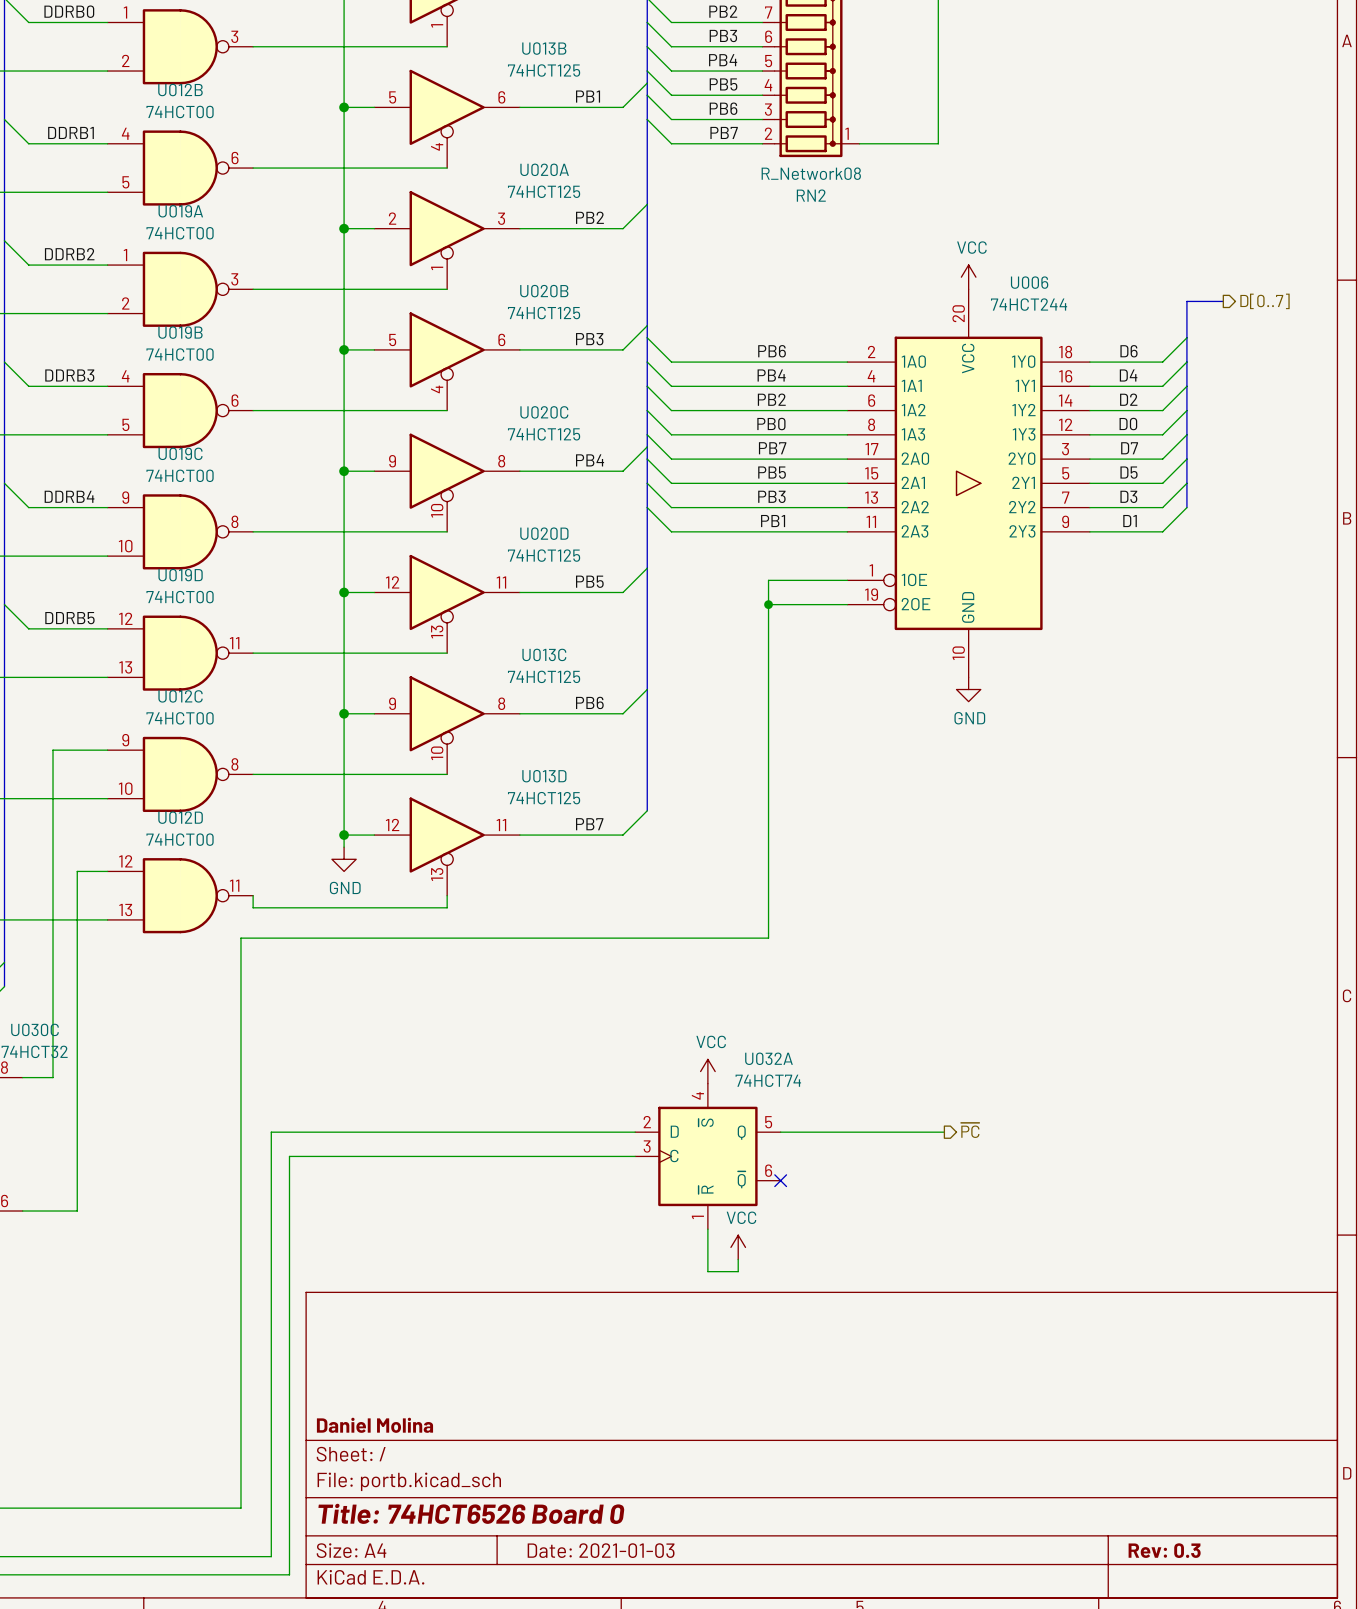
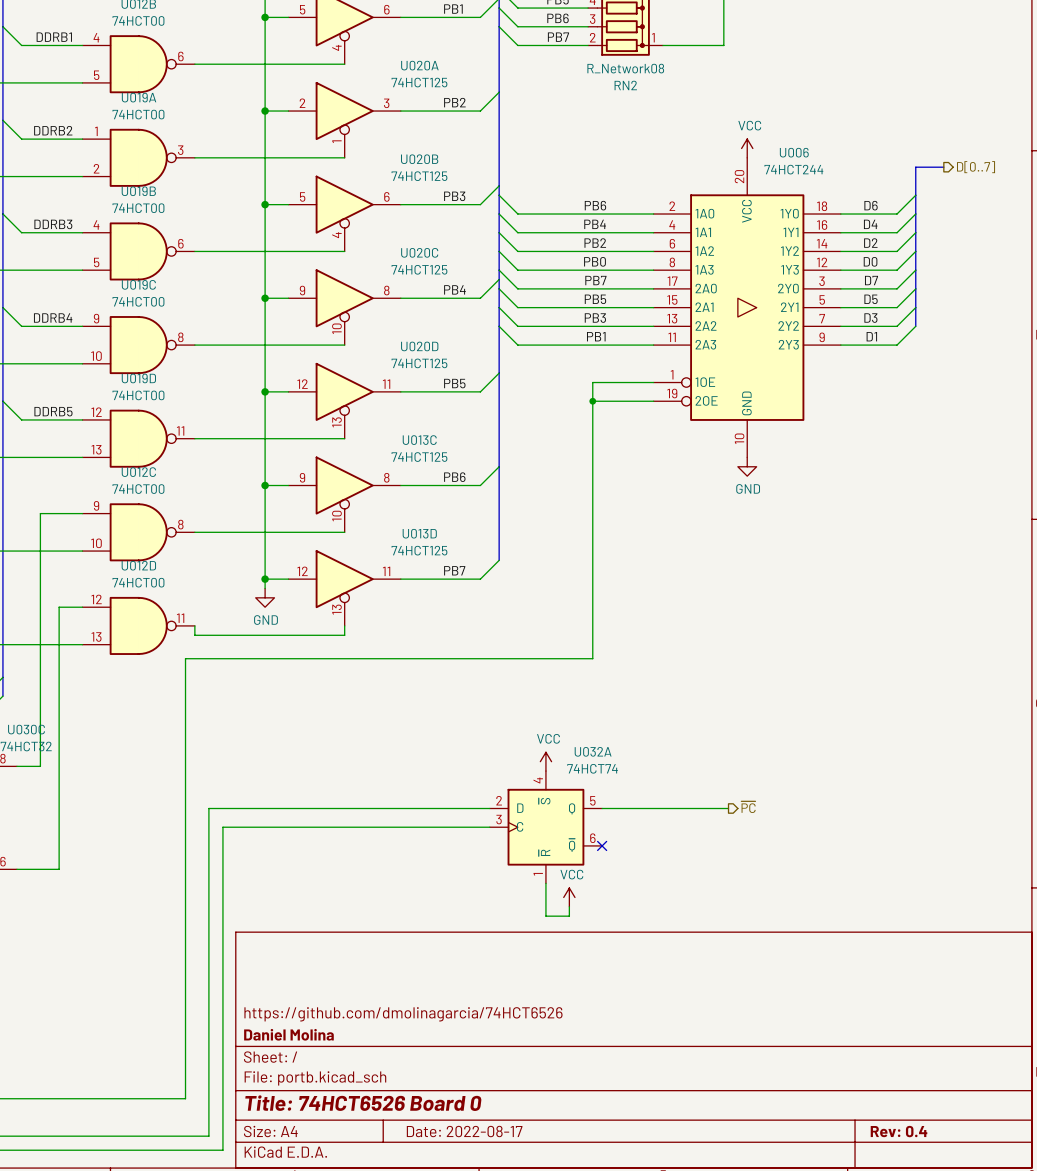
title block: none -> https://github.com/dmolinagarcia/74HCT6526 (403, 1014)
title block: Date: 2021-01-03 (601, 1550) -> Date: 2022-08-17 (464, 1131)
title block: Rev: 0.3 (1164, 1550) -> Rev: 0.4 (899, 1131)

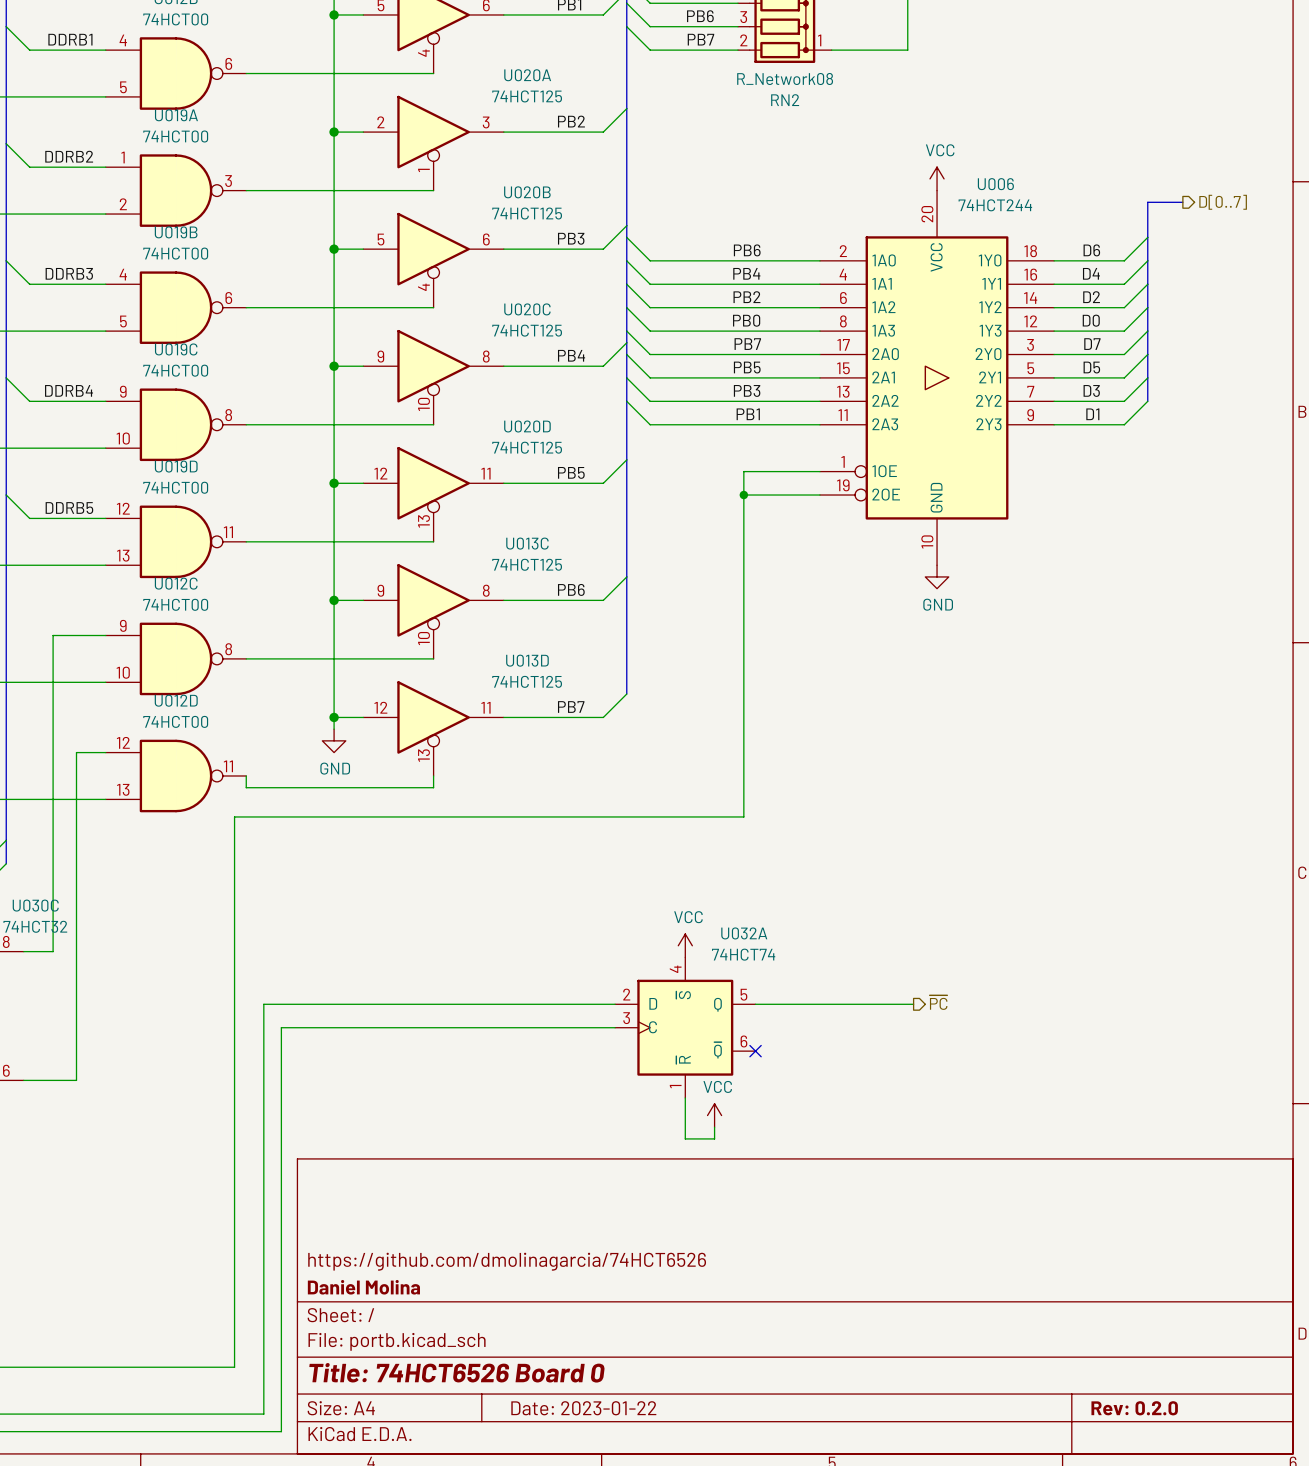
title block: Date: 2022-08-17 (464, 1131) -> Date: 2023-01-22 (583, 1408)
title block: Rev: 0.4 (899, 1131) -> Rev: 0.2.0 (1134, 1408)

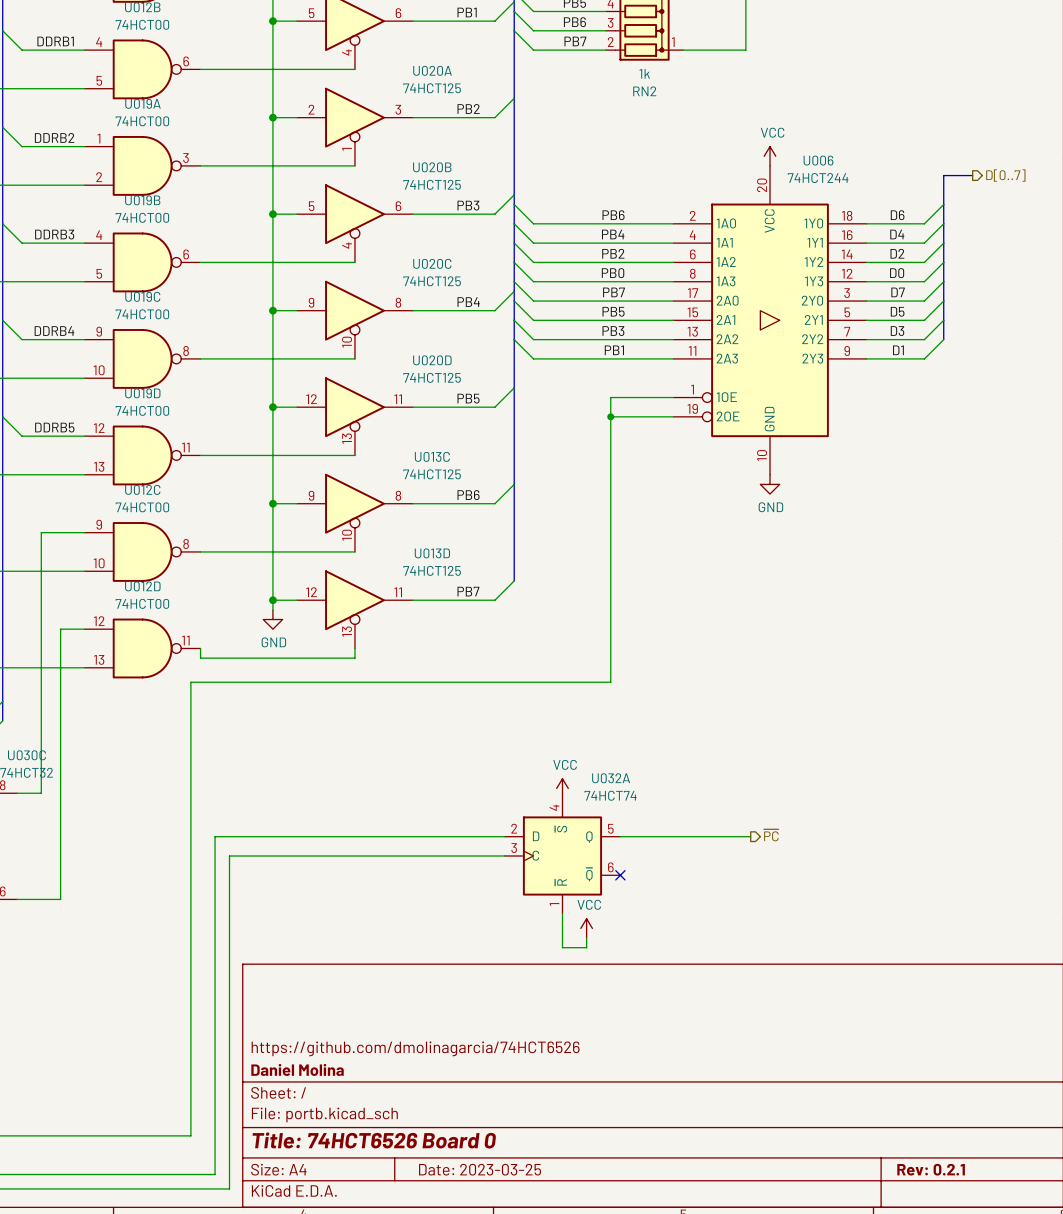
RN2 value: R_Network08 (785, 79) -> 1k (644, 73)
title block: Date: 2023-01-22 (583, 1408) -> Date: 2023-03-25 (480, 1169)
title block: Rev: 0.2.0 (1134, 1408) -> Rev: 0.2.1 (931, 1169)

